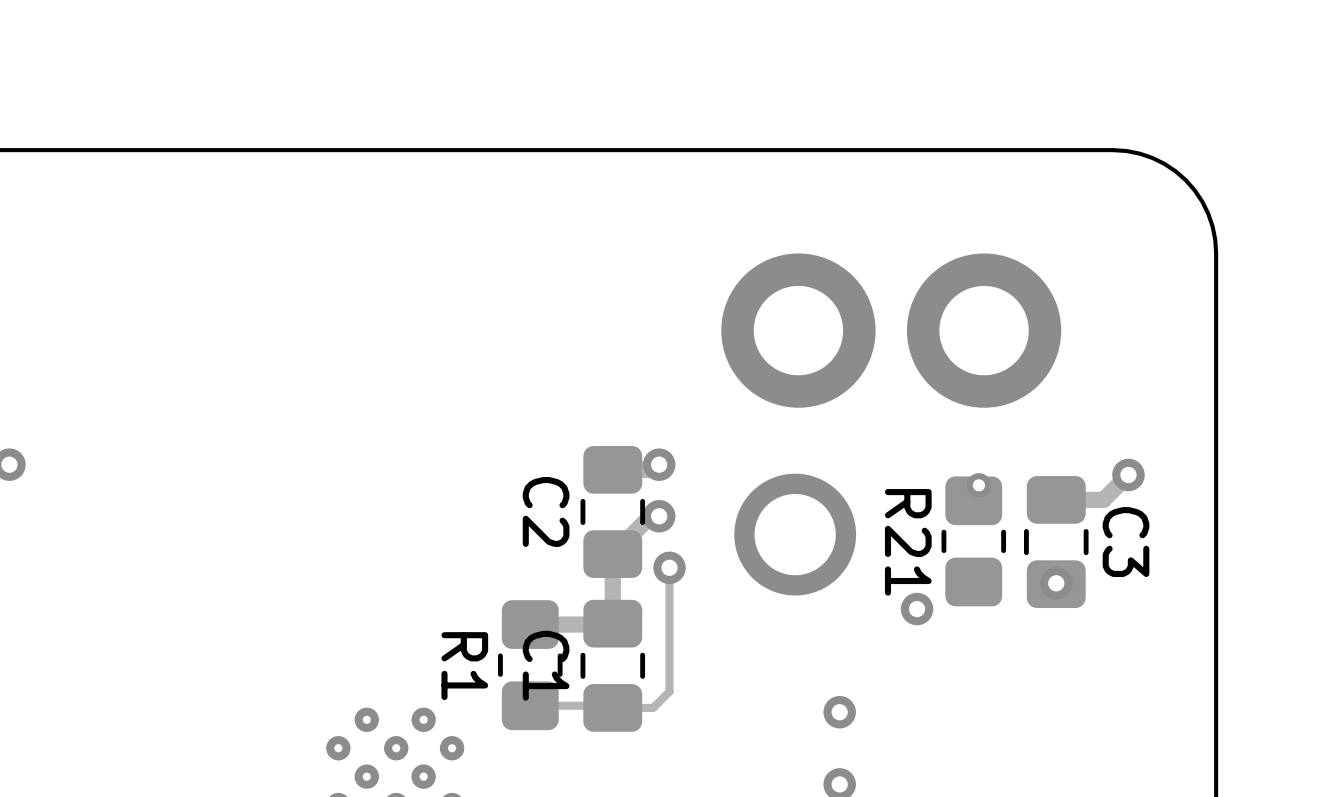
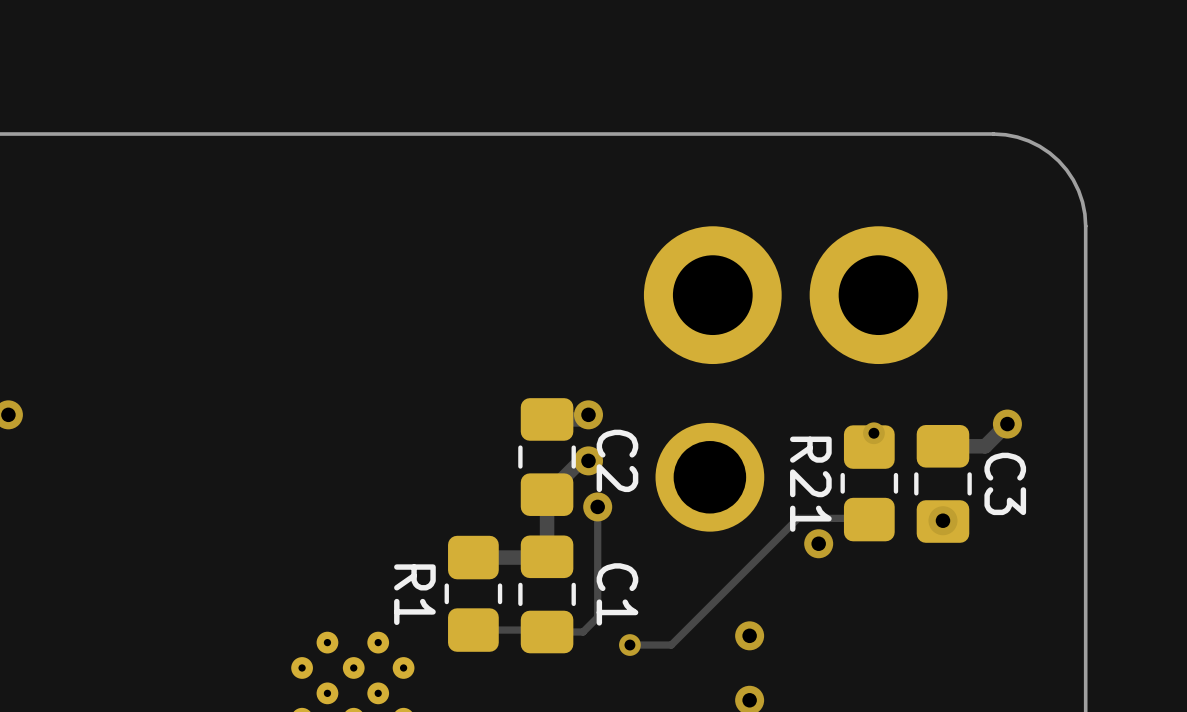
C2 name position: C2 (546, 511) -> C2 (617, 460)
track: none -> (869, 519) (798, 518) (671, 645) (629, 645)
C1 name position: C1 (546, 665) -> C1 (617, 594)
via: none -> (629, 645)

